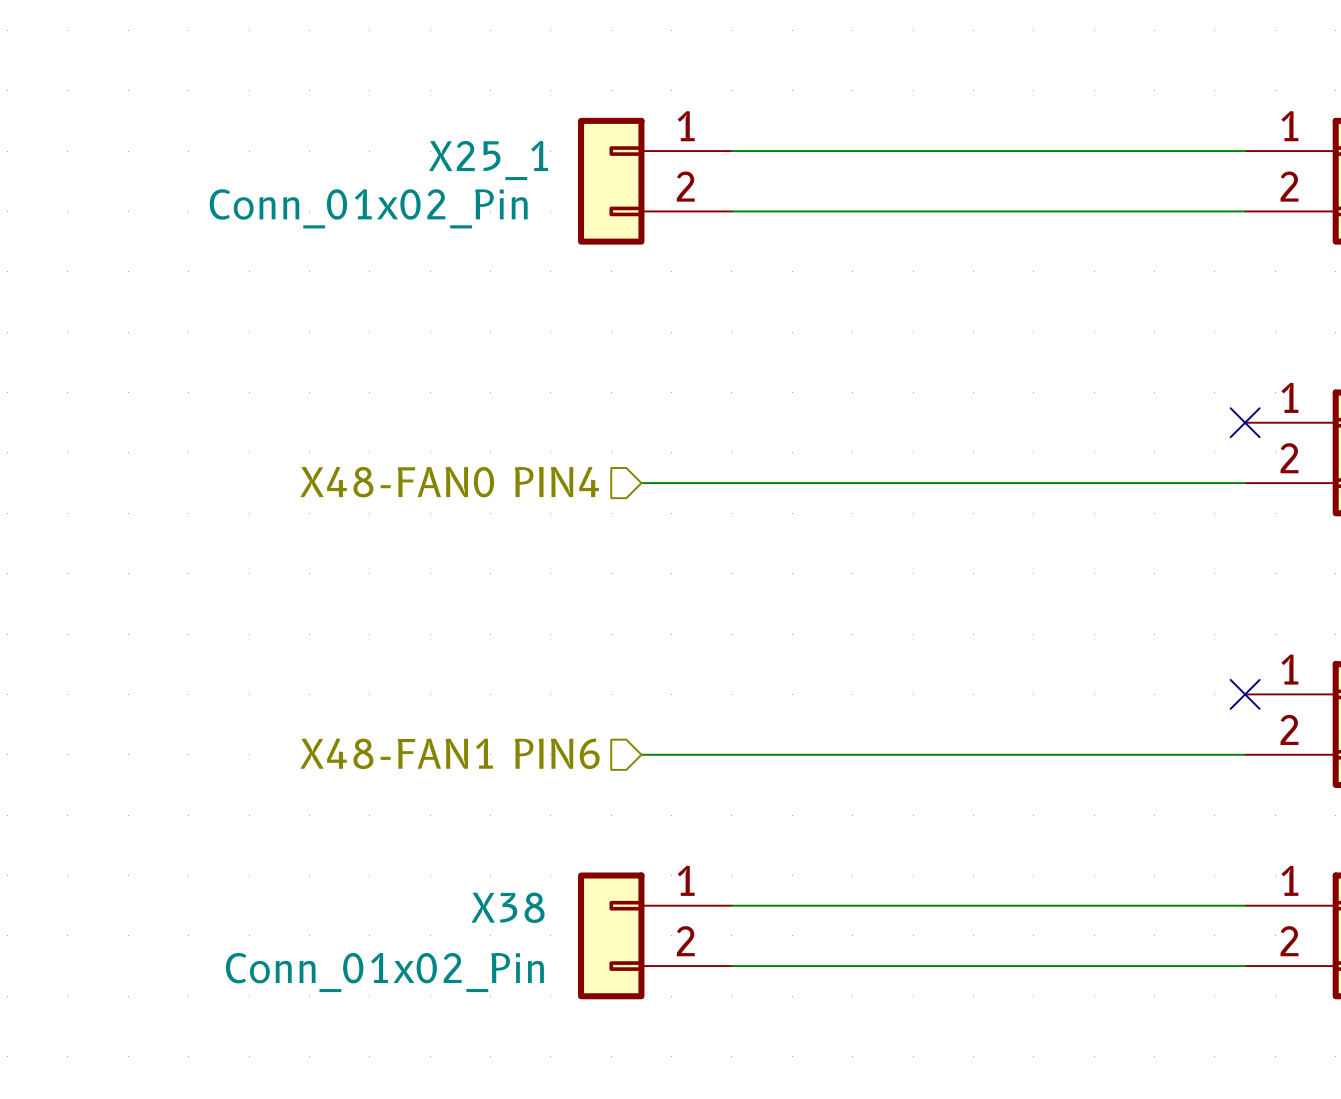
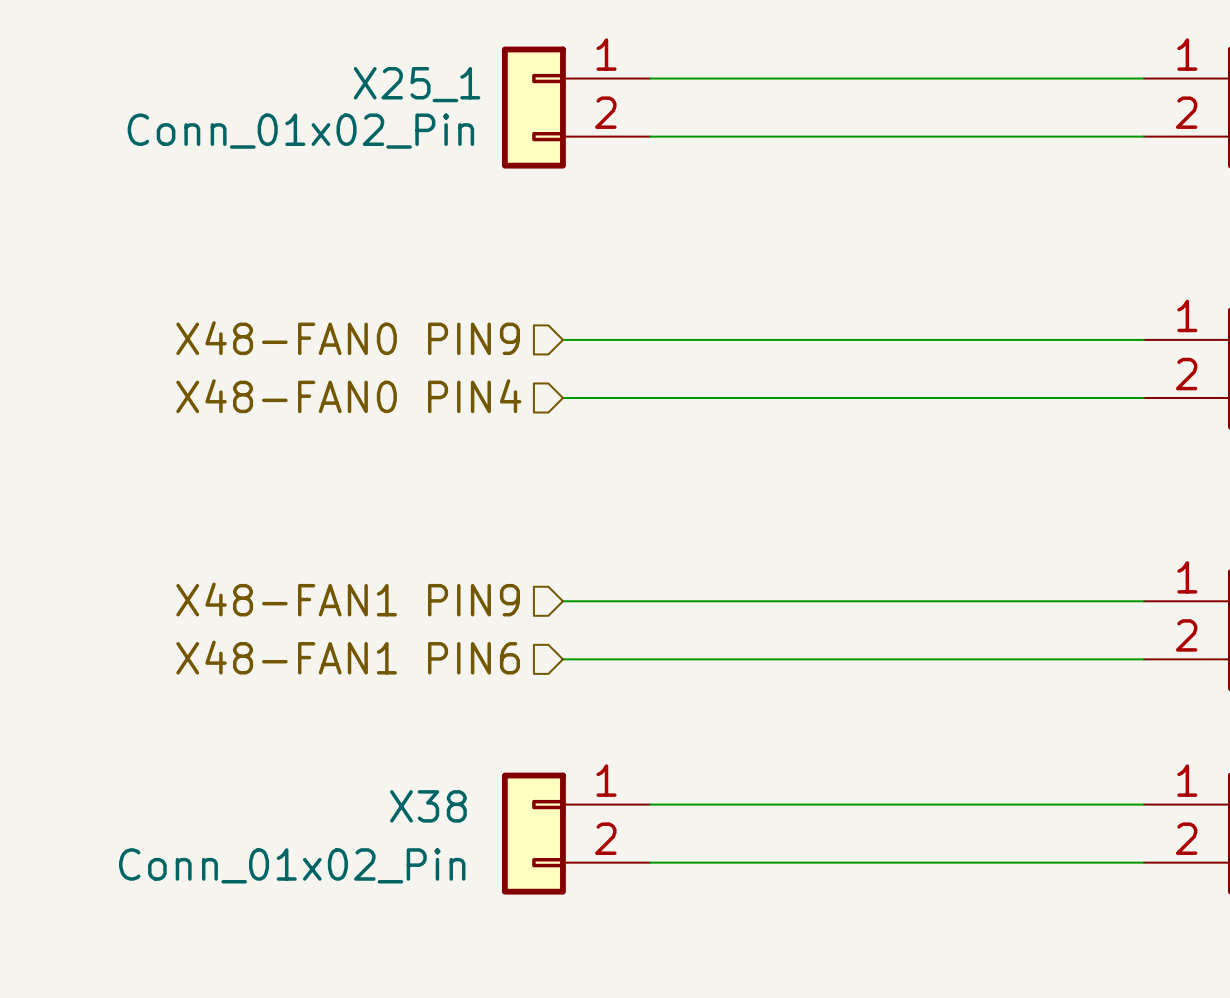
hierarchical label: none -> X48-FAN0 PIN9 (348, 338)
wire: none -> (562, 339) (1143, 339)
no-connect mark: (1245, 422) -> none
hierarchical label: none -> X48-FAN1 PIN9 (348, 599)
wire: none -> (562, 601) (1143, 601)
no-connect mark: (1245, 694) -> none

